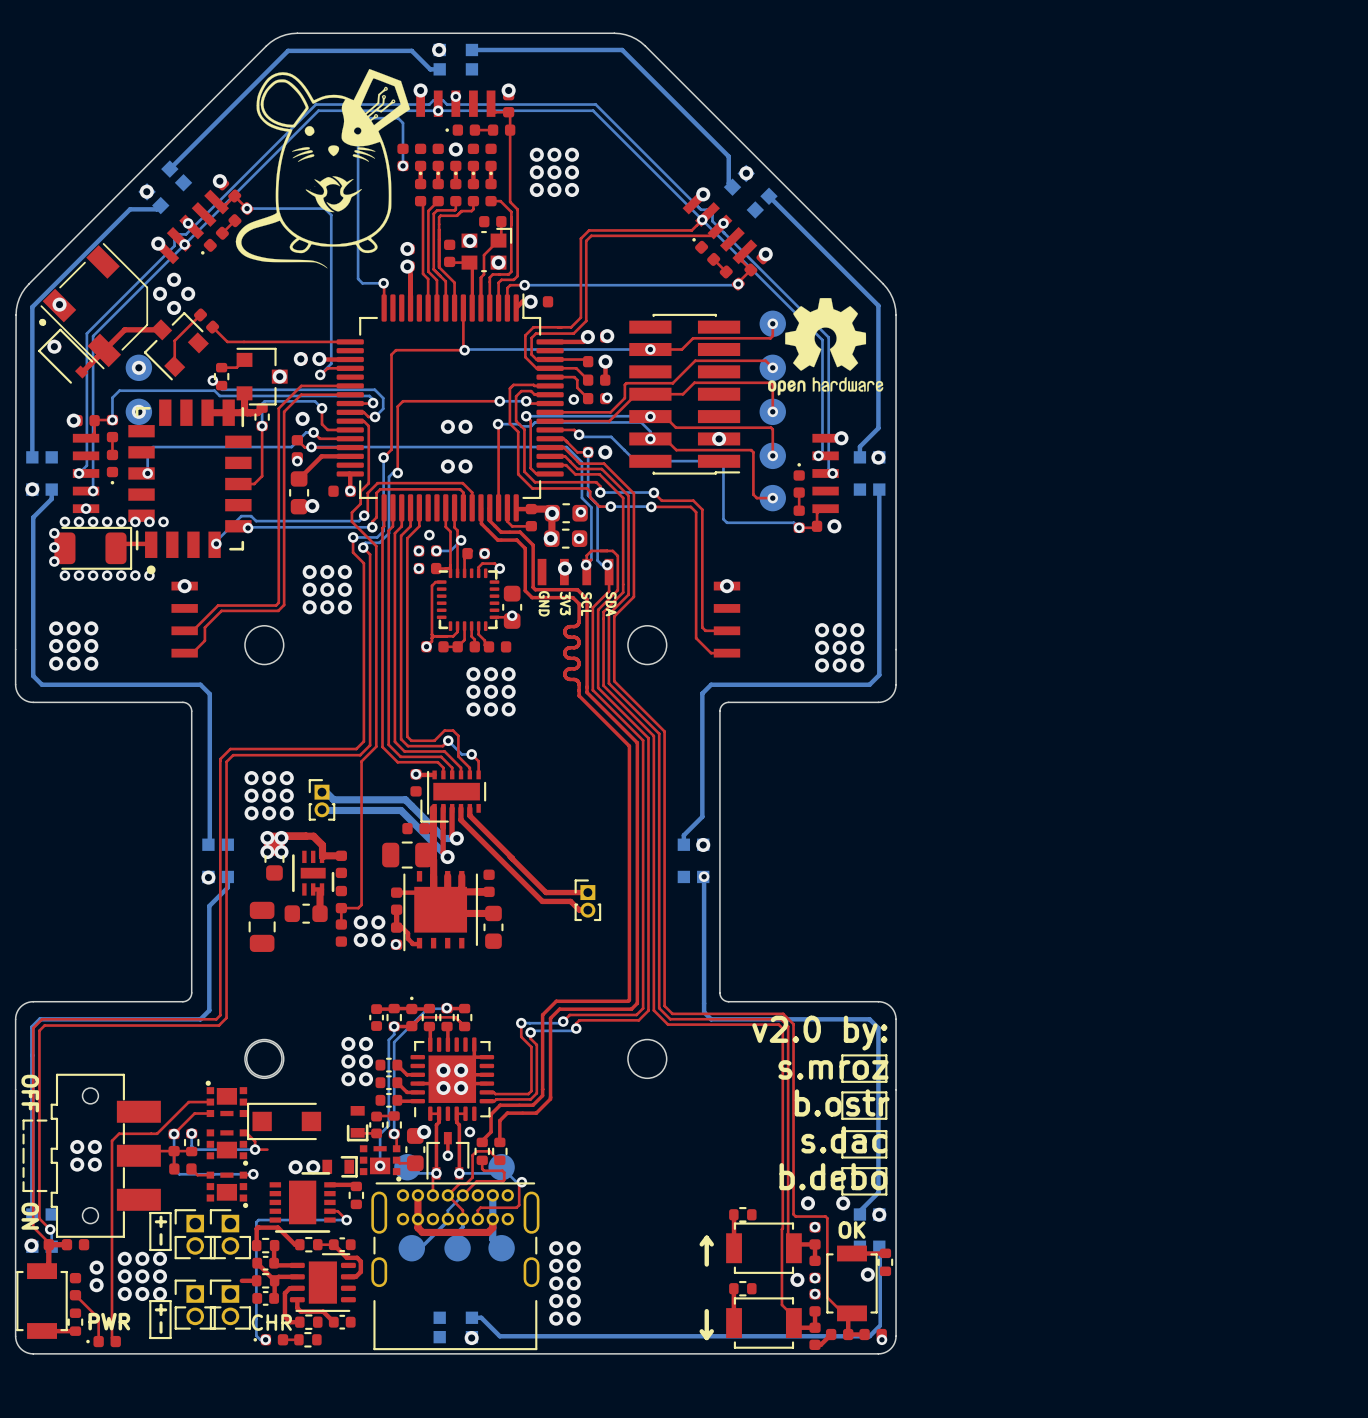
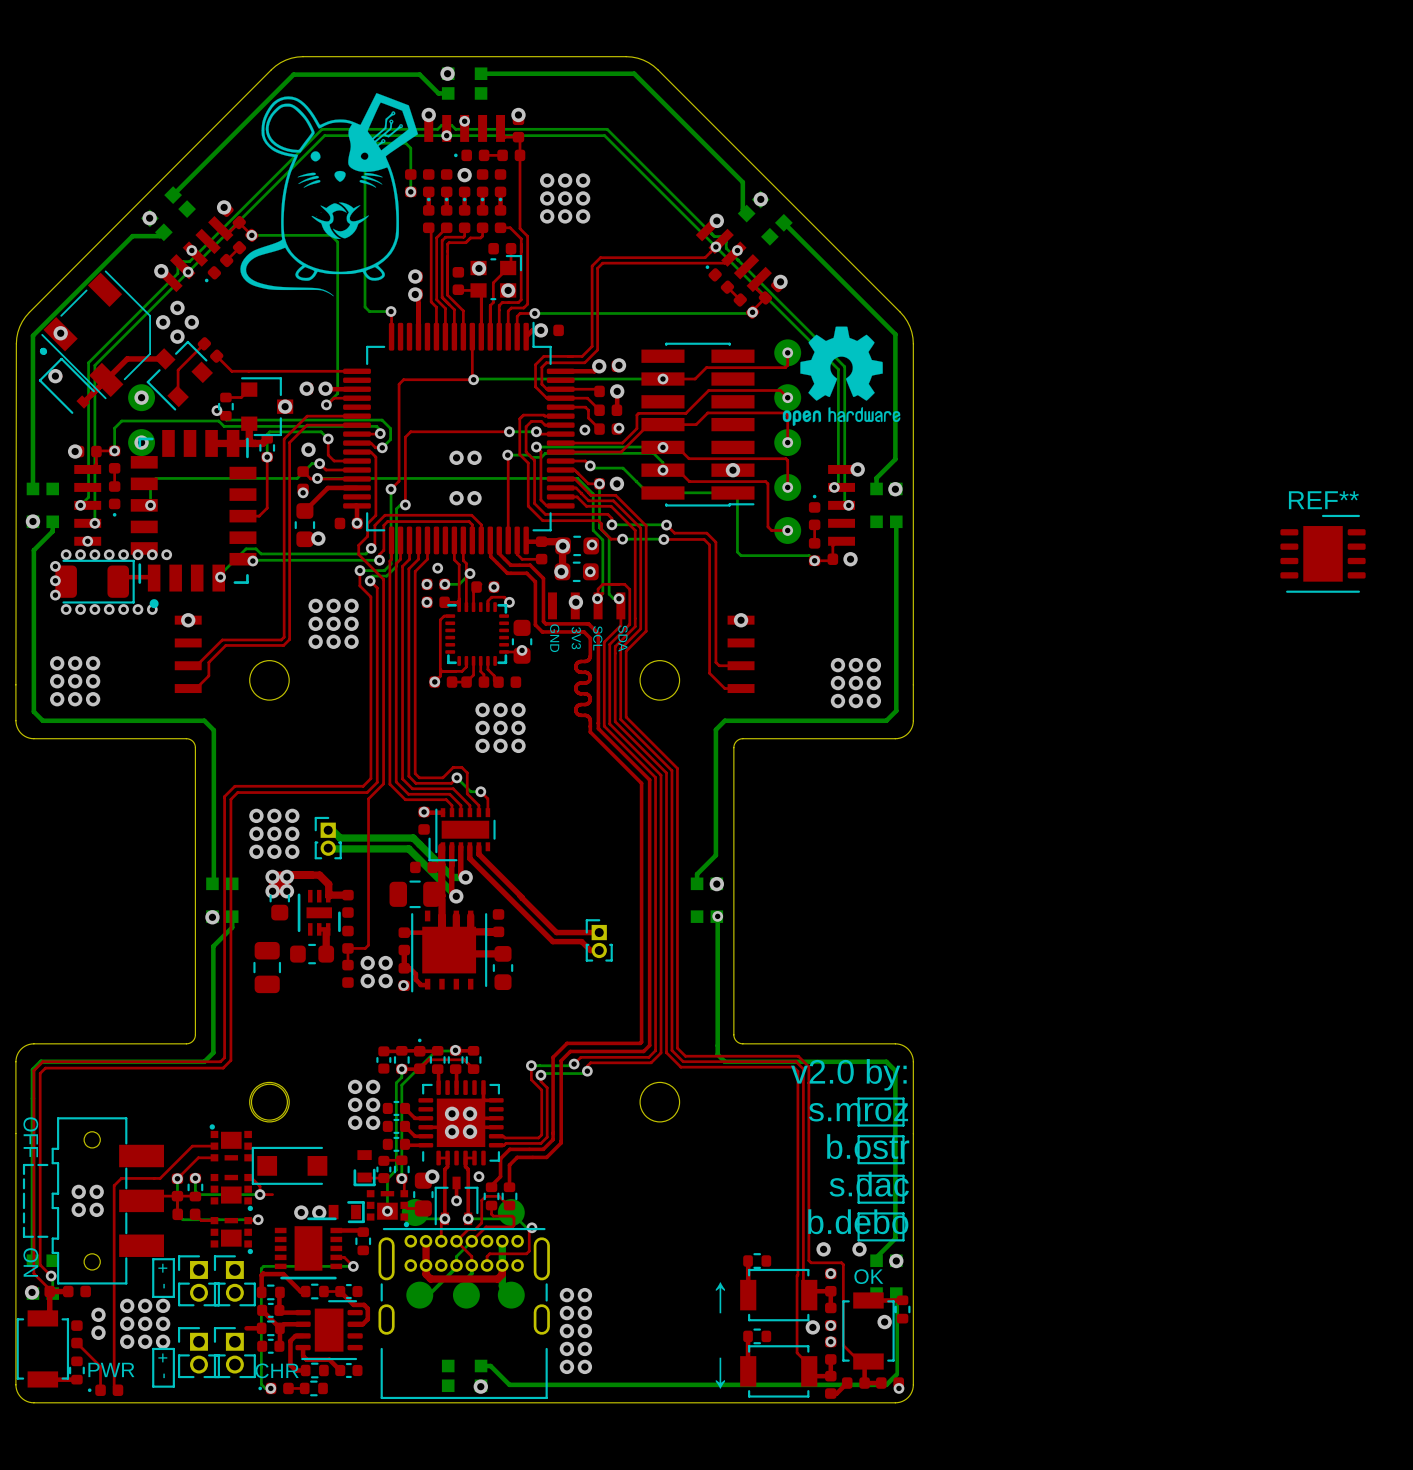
REF**: none -> (1323, 553)

